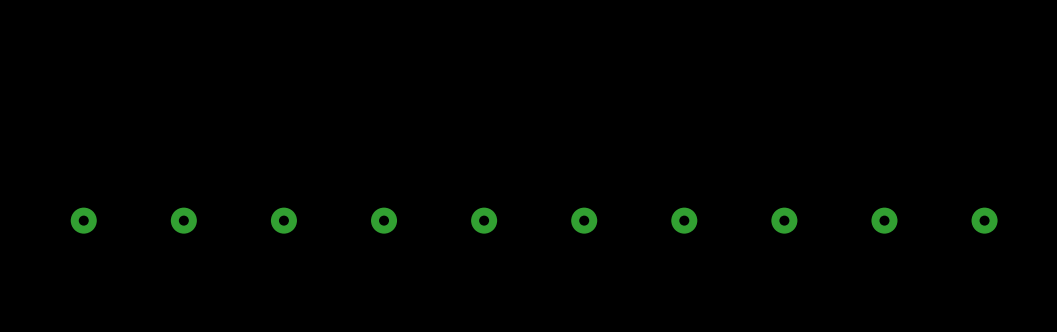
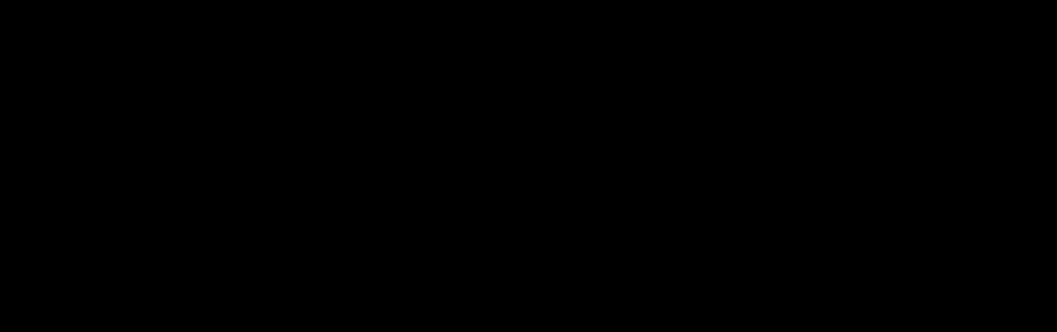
via: (83, 220) -> none
via: (183, 220) -> none
via: (283, 220) -> none
via: (384, 220) -> none
via: (484, 220) -> none
via: (584, 220) -> none
via: (684, 220) -> none
via: (784, 220) -> none
via: (884, 220) -> none
via: (984, 220) -> none

